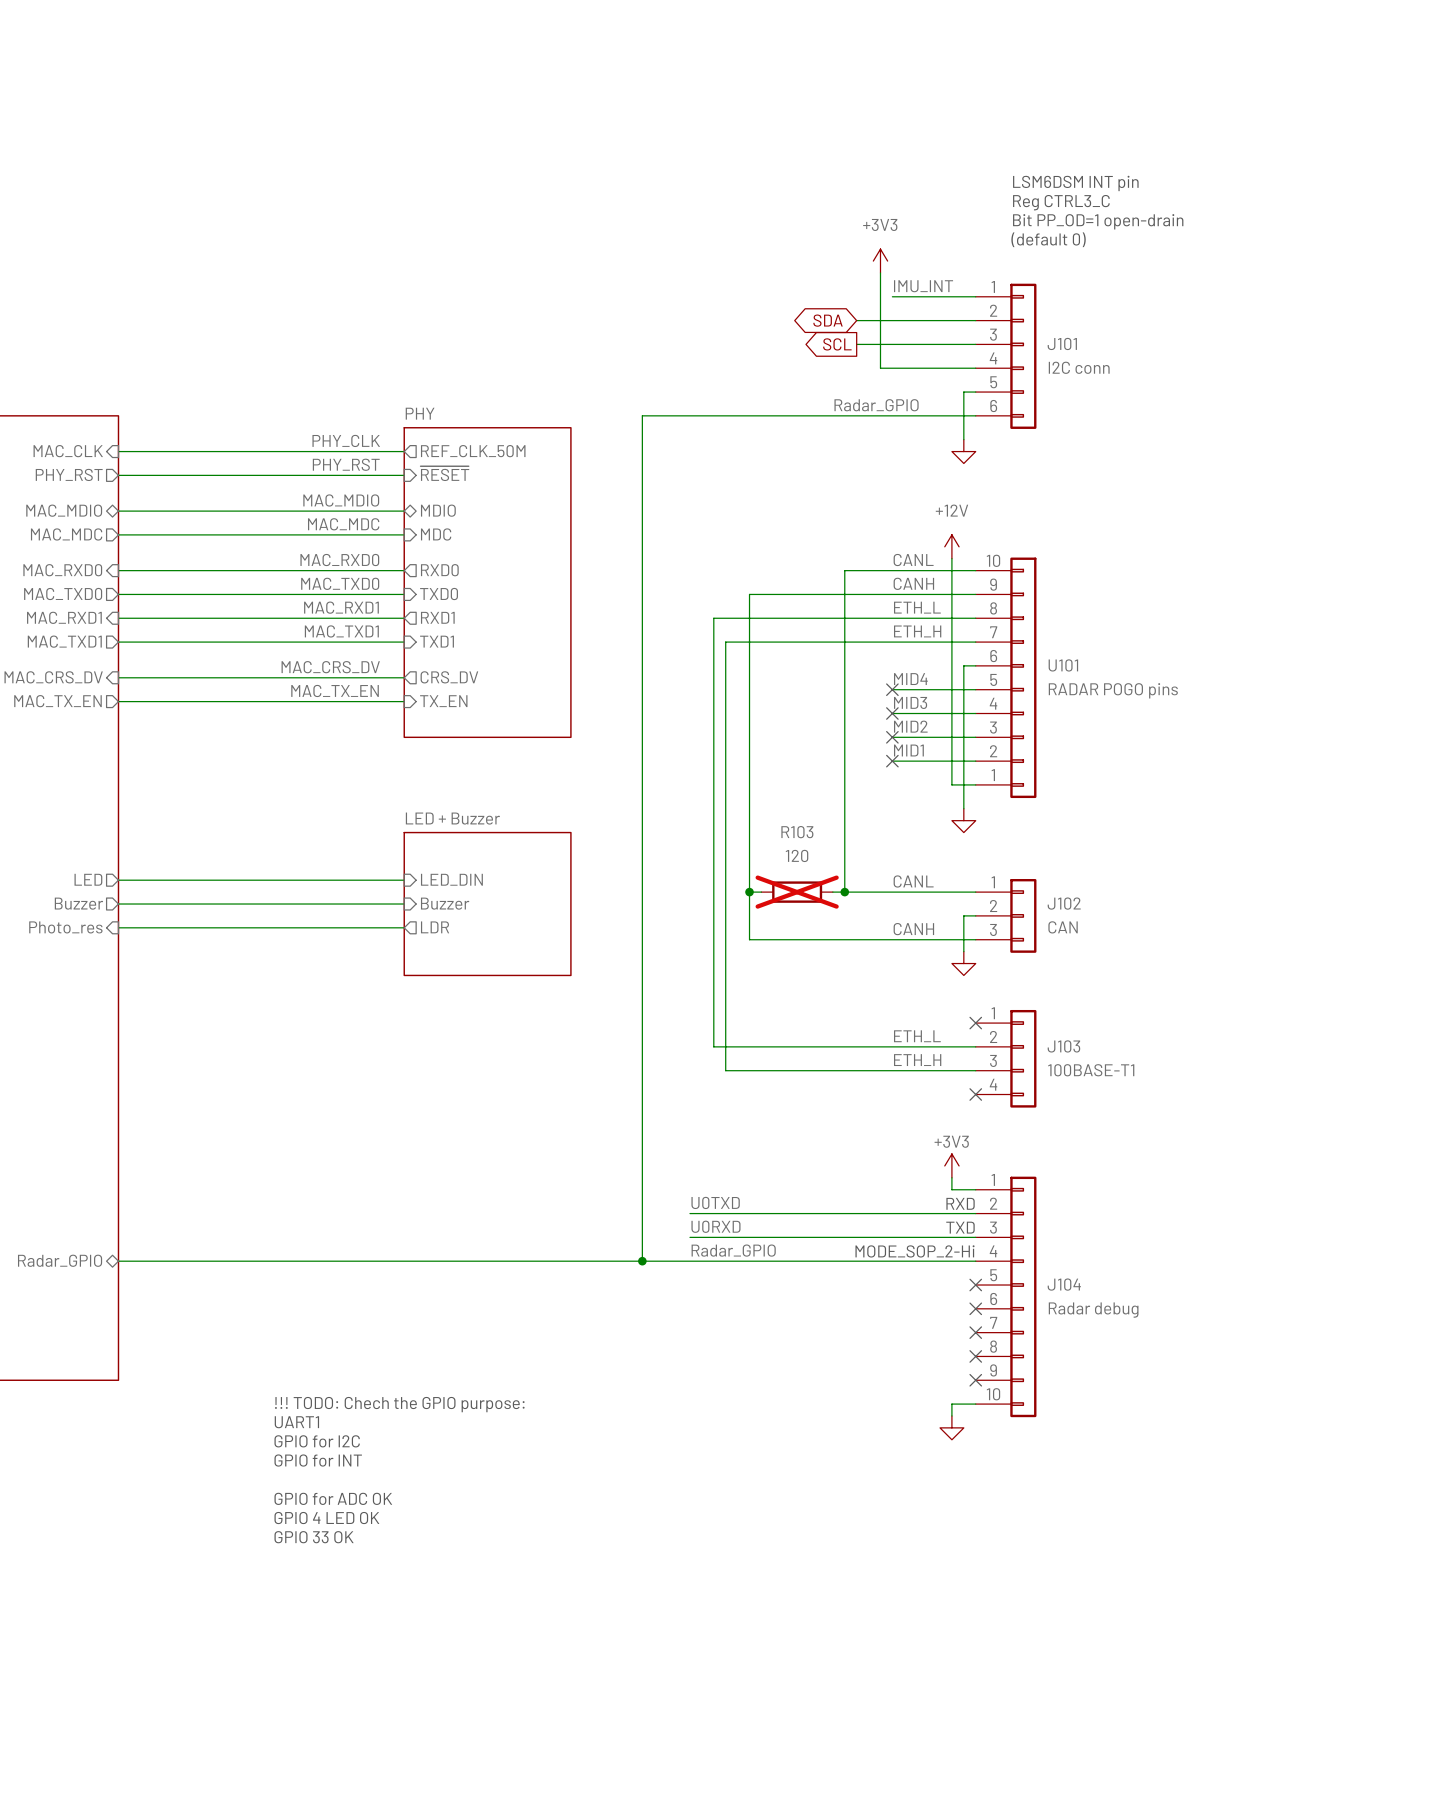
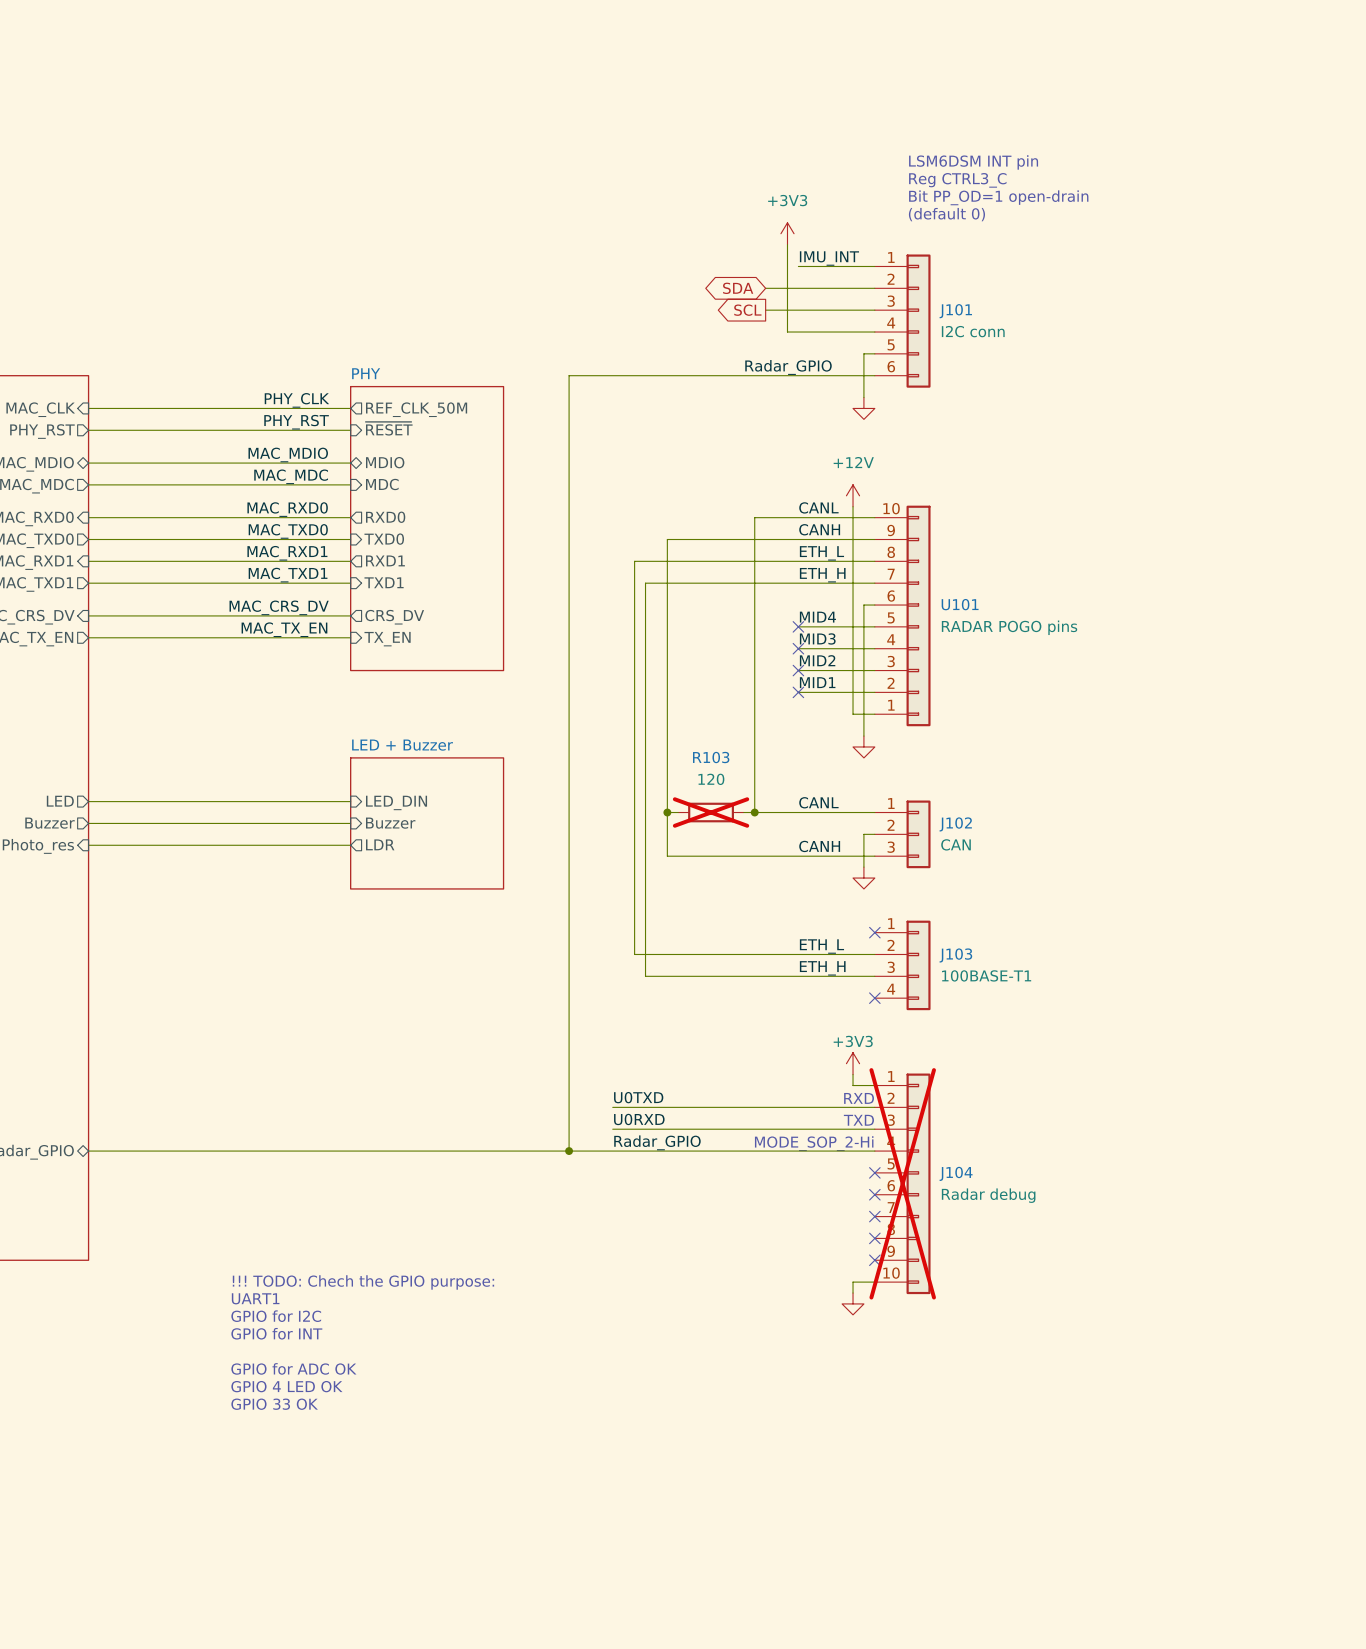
J104 do-not-place cross: none -> (902, 1183)

